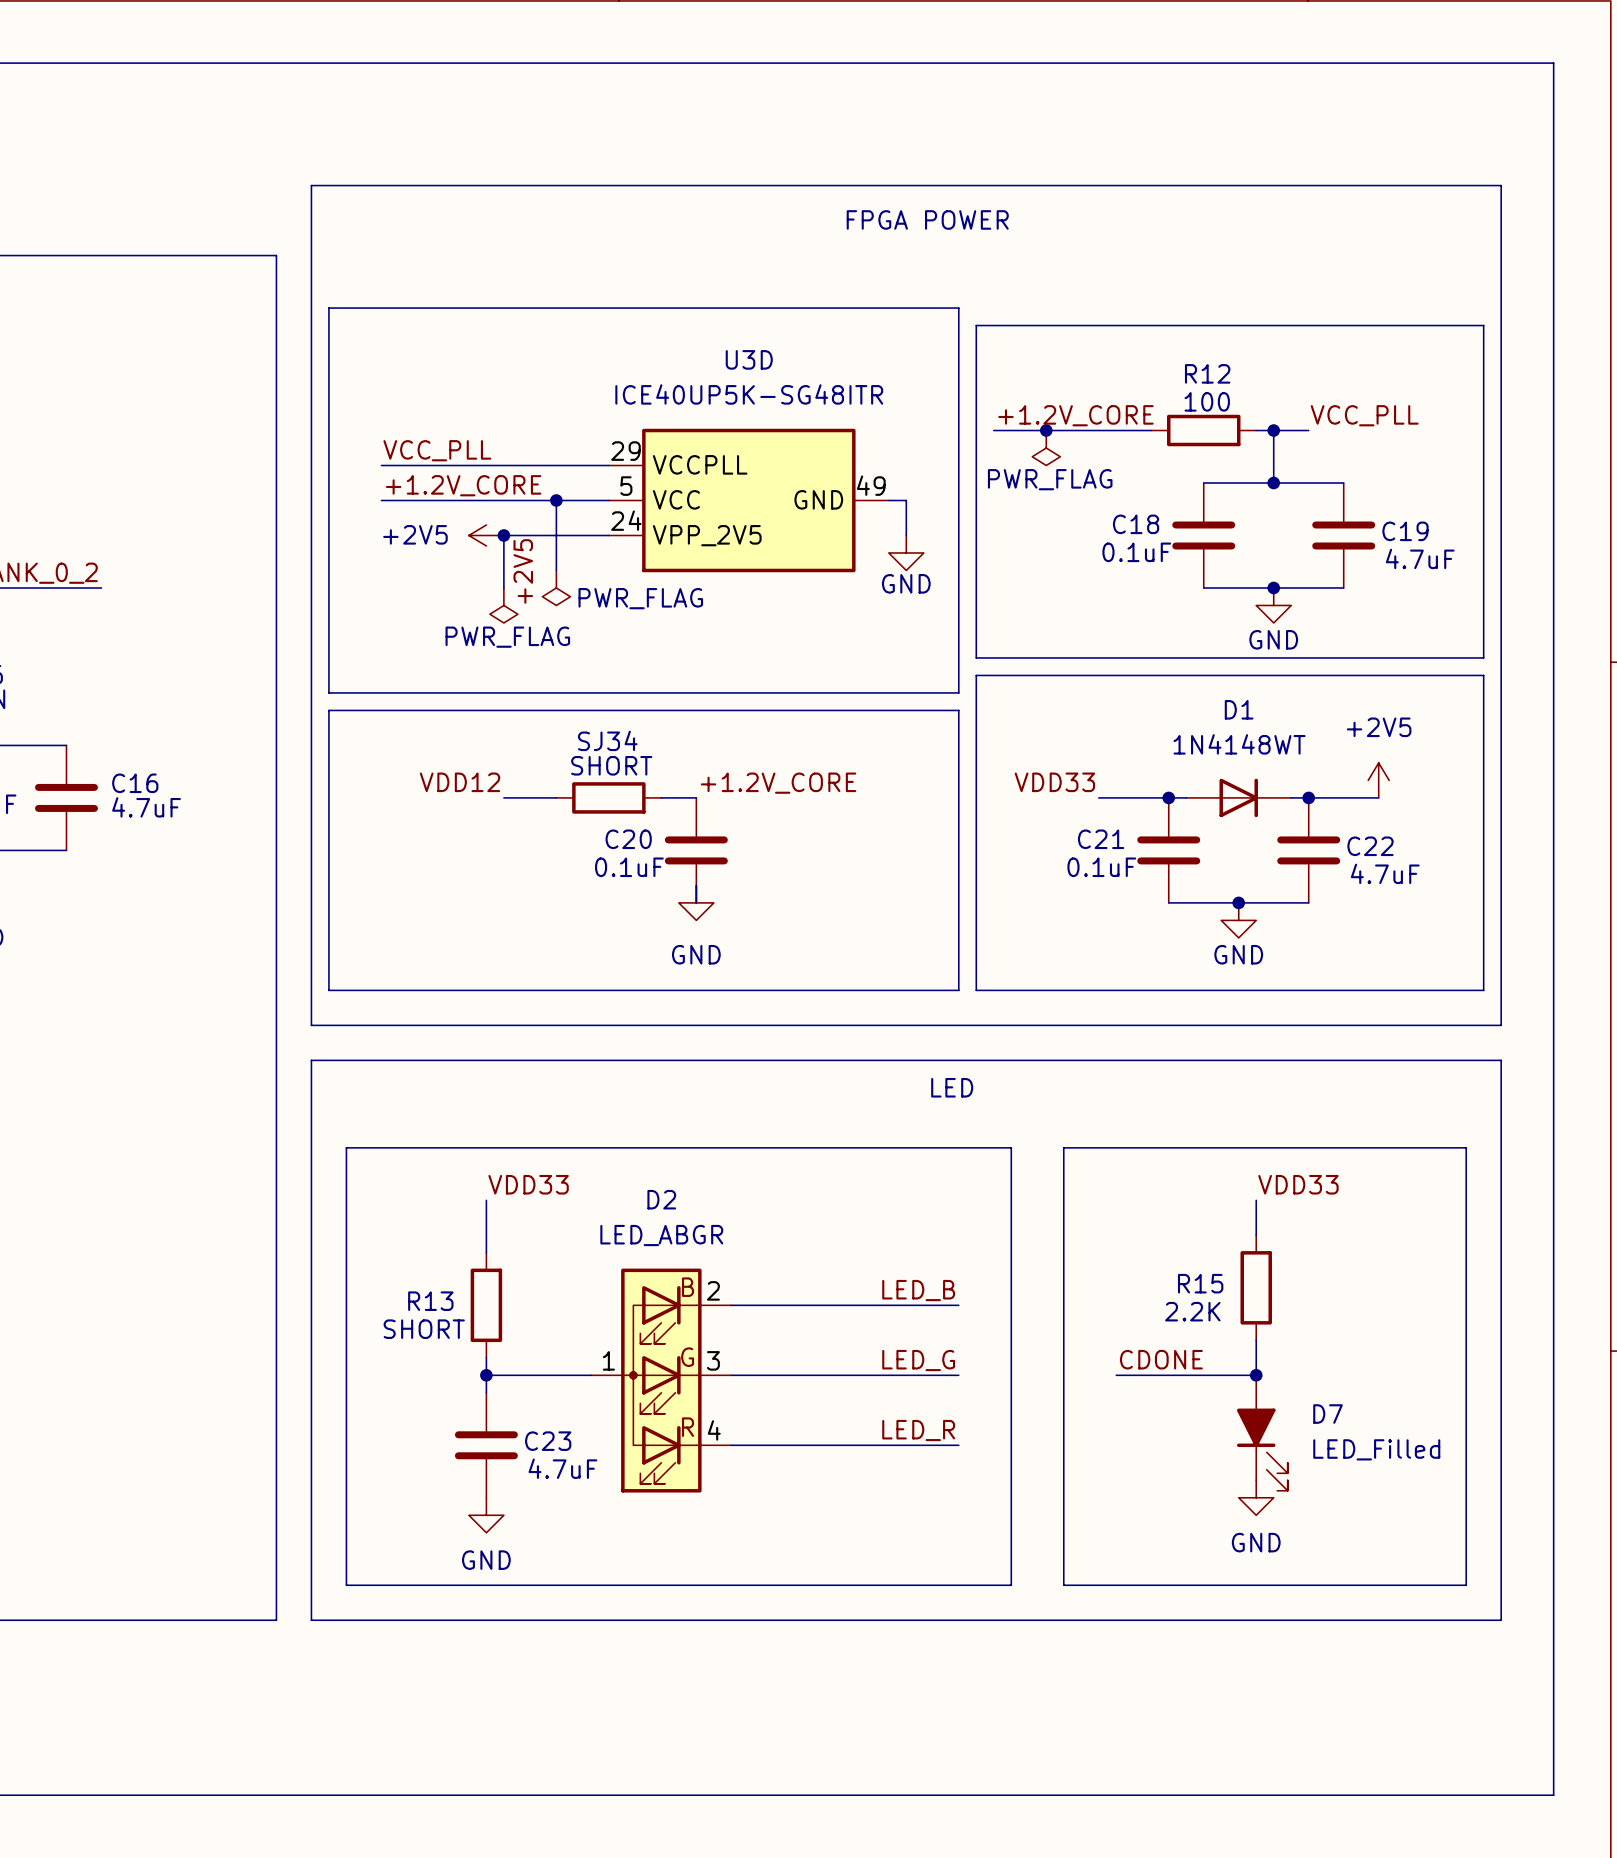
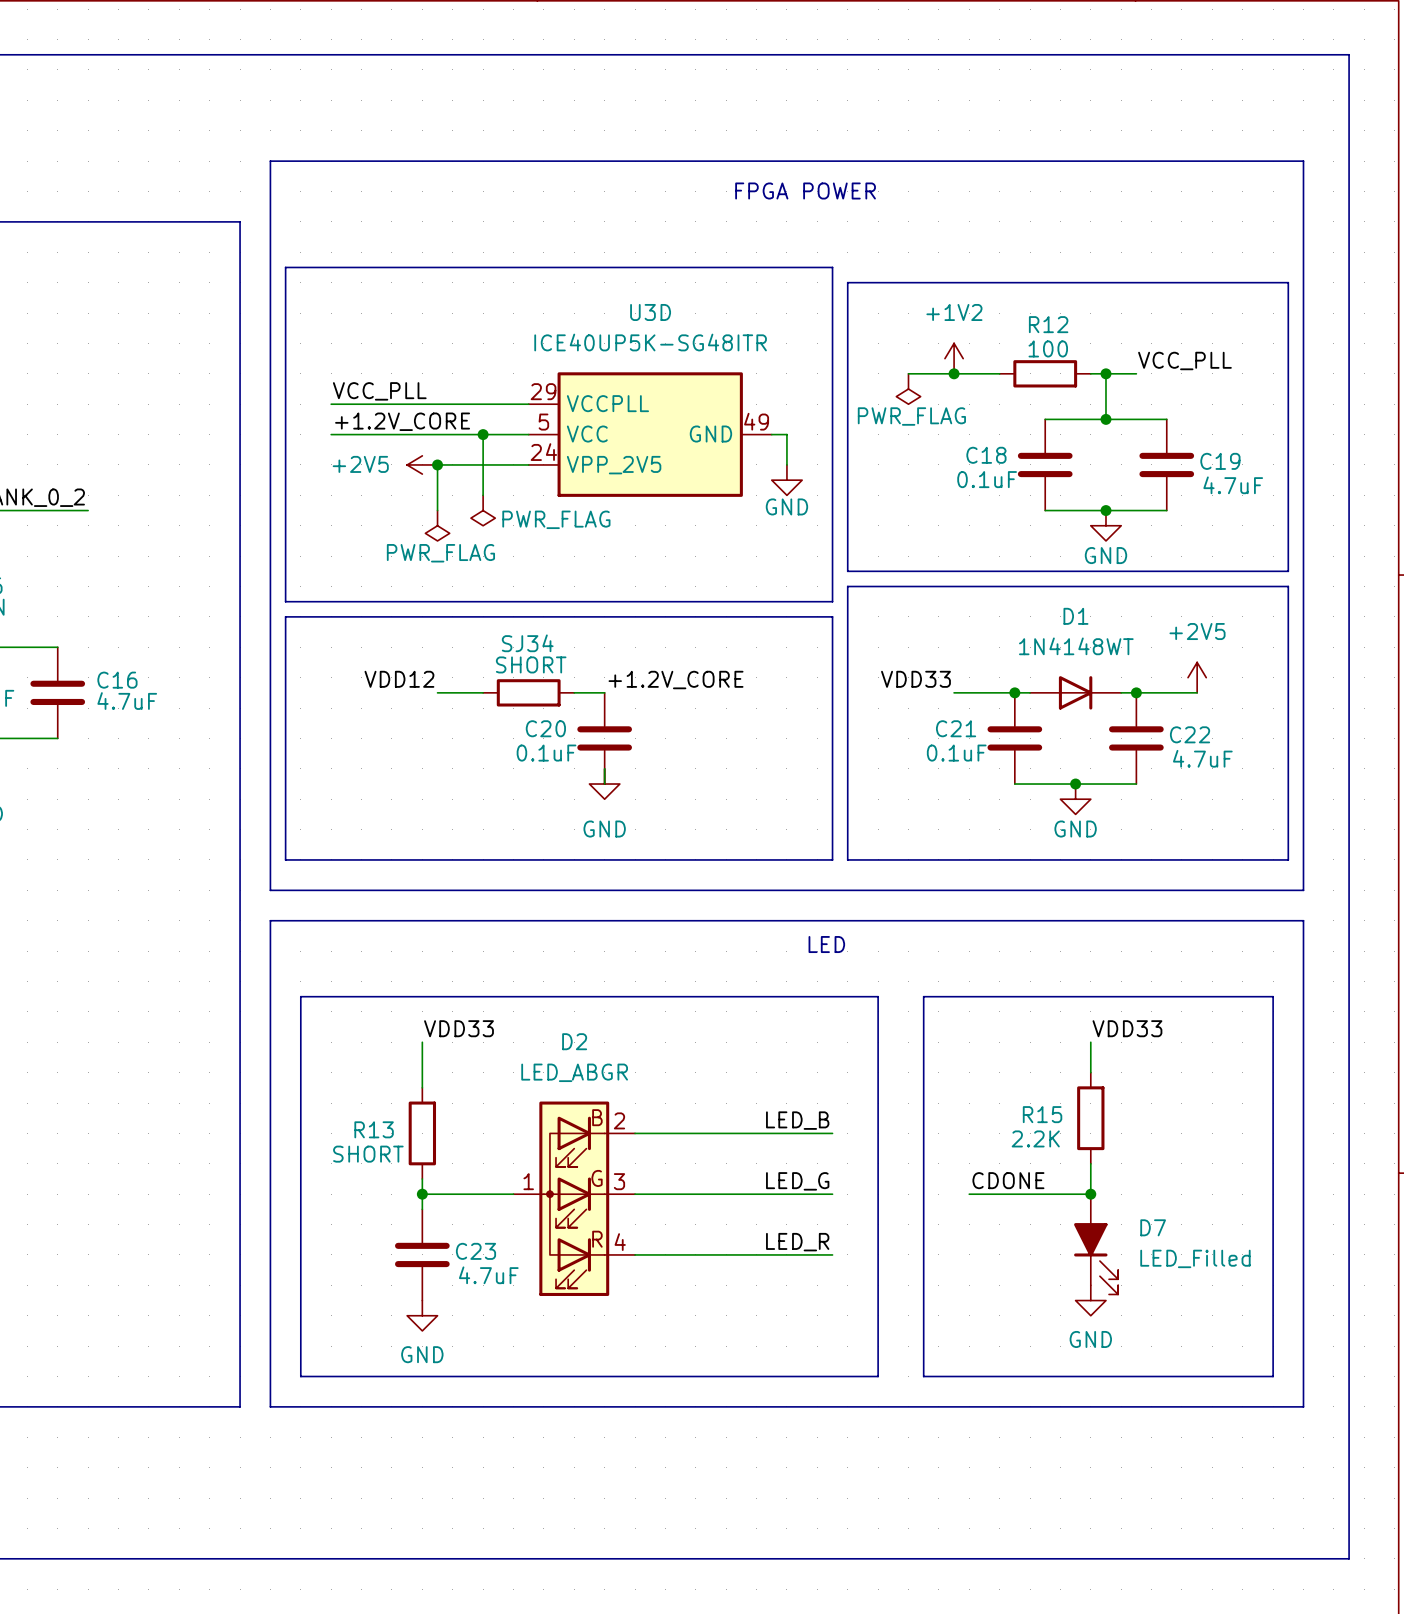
power symbol: none -> +1V2 (954, 358)
label: +1.2V_CORE (1075, 415) -> none
wire: (993, 430) (1046, 430) -> none
junction position: (1046, 430) -> (954, 373)
label: +2V5 (523, 571) -> none

